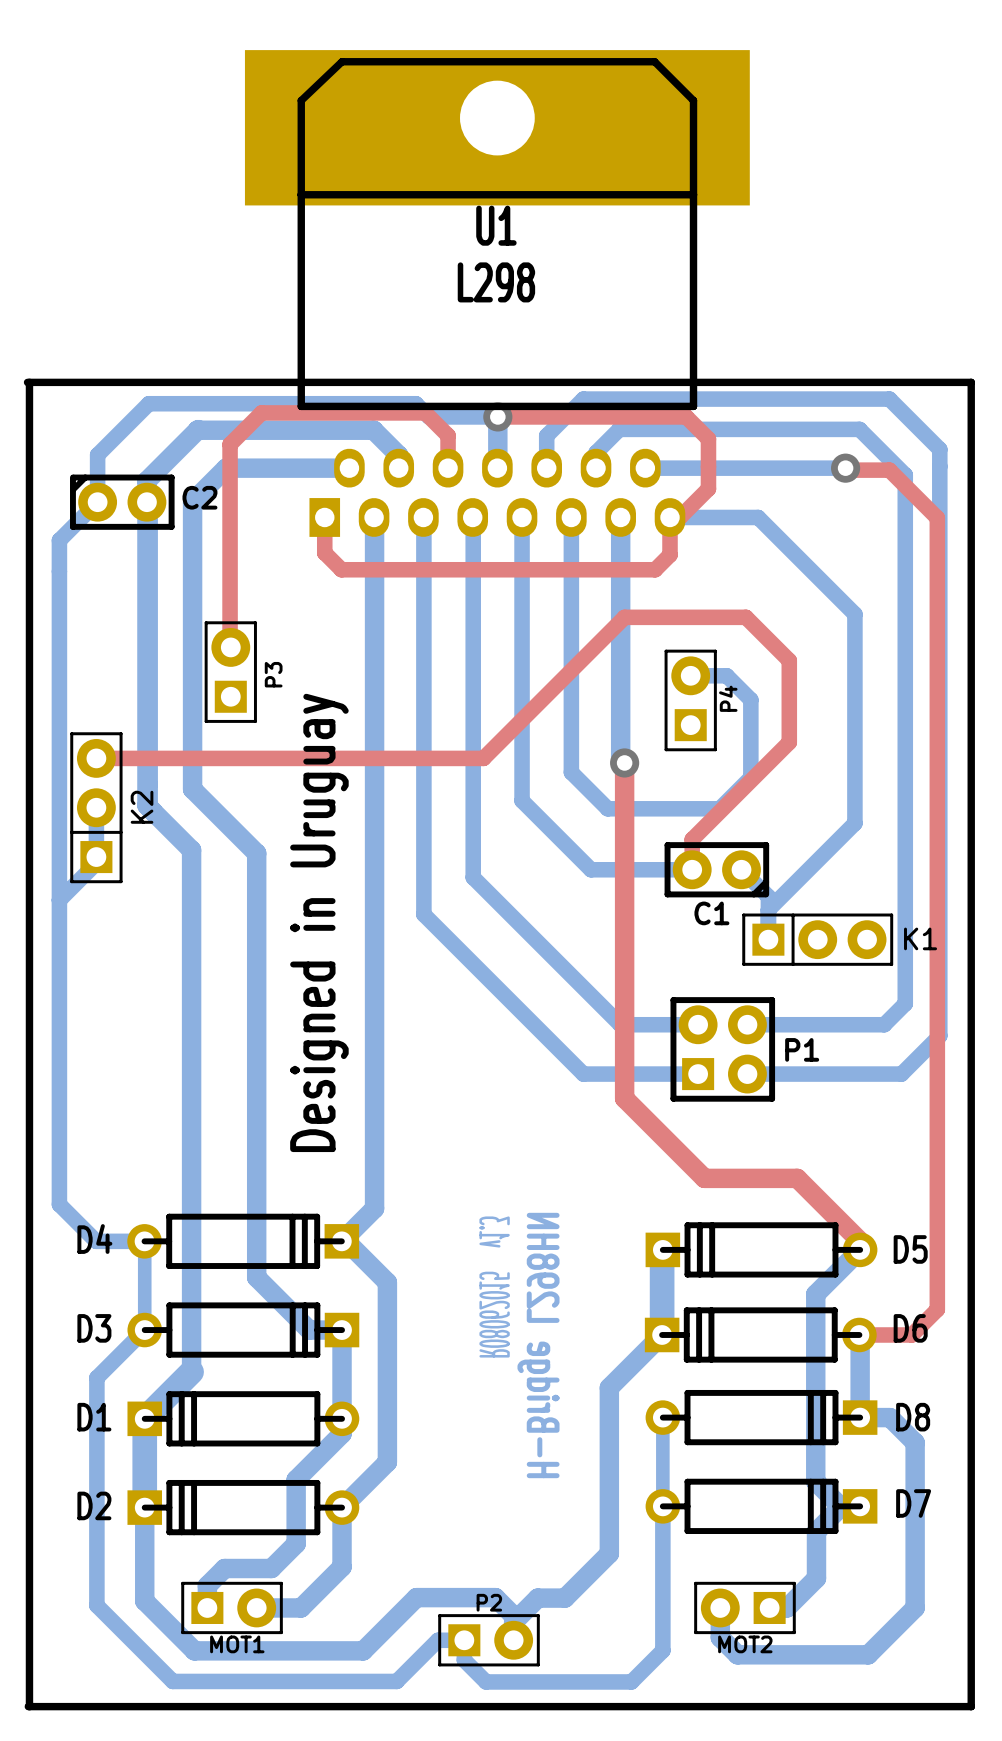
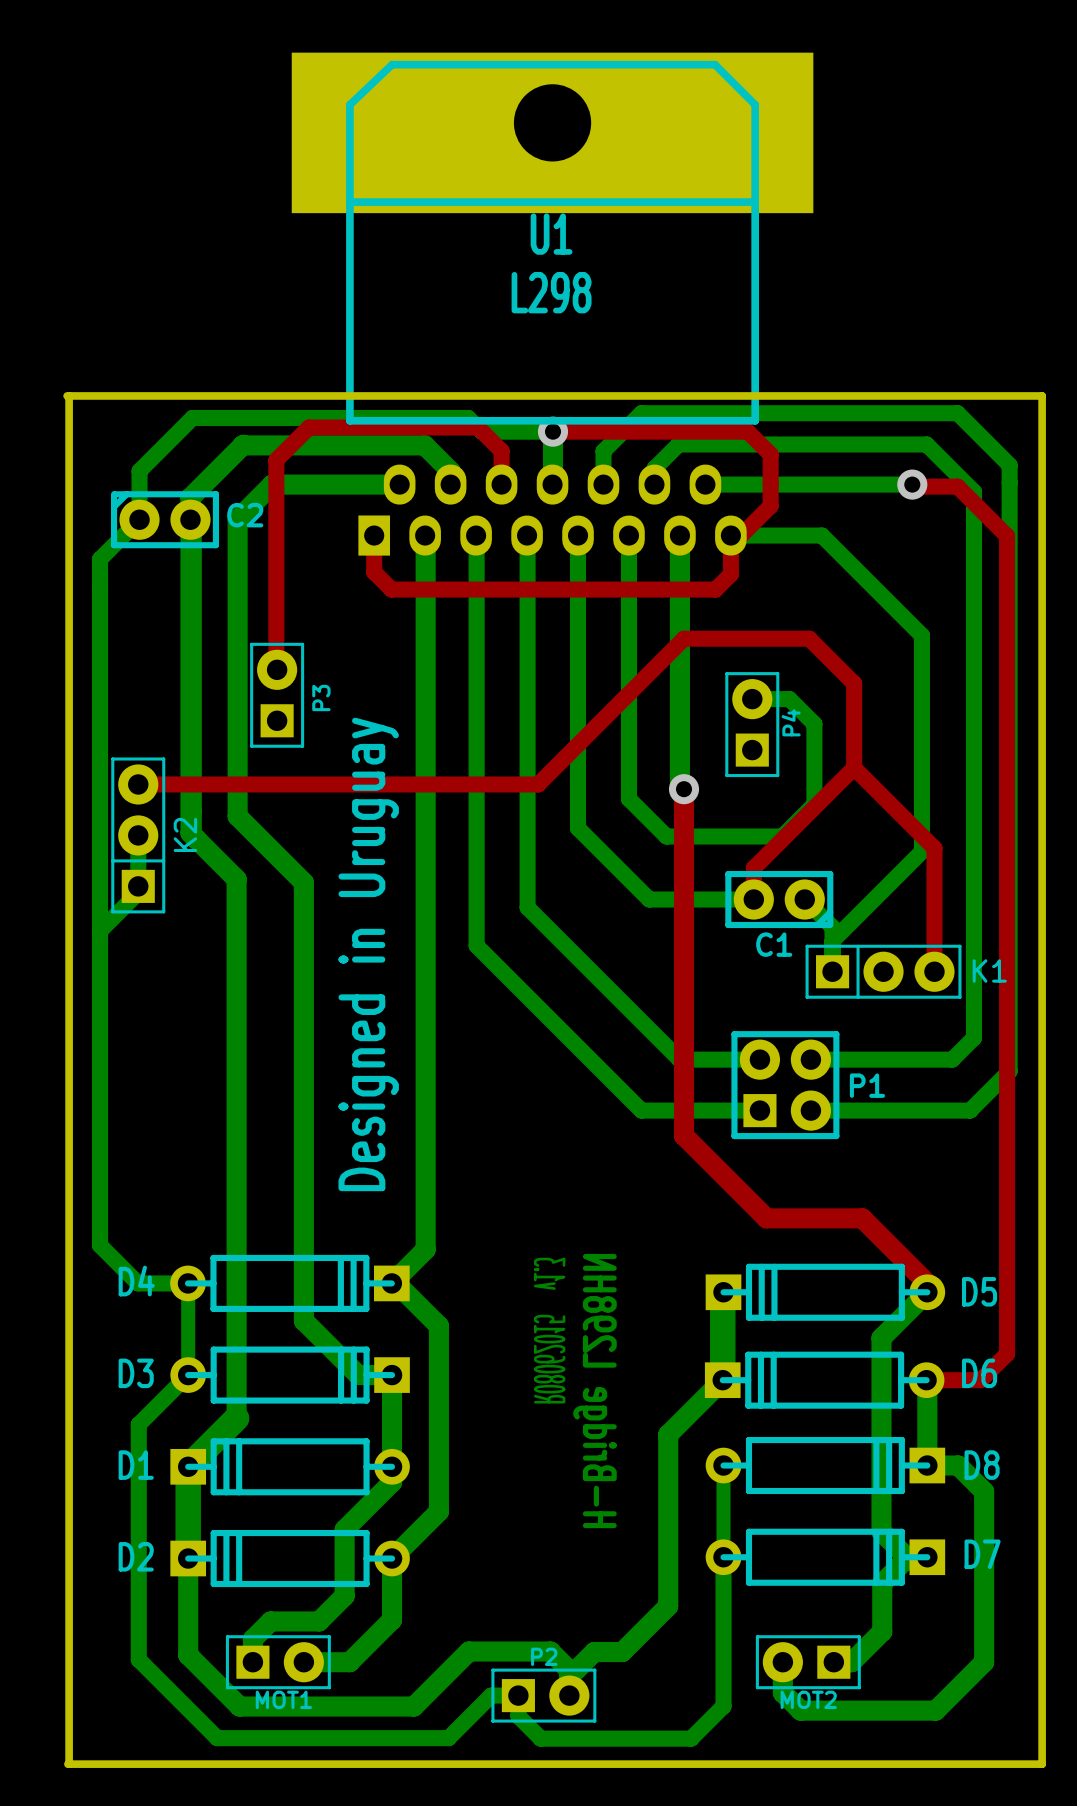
top track: none -> (854, 767) (934, 848) (934, 971)

